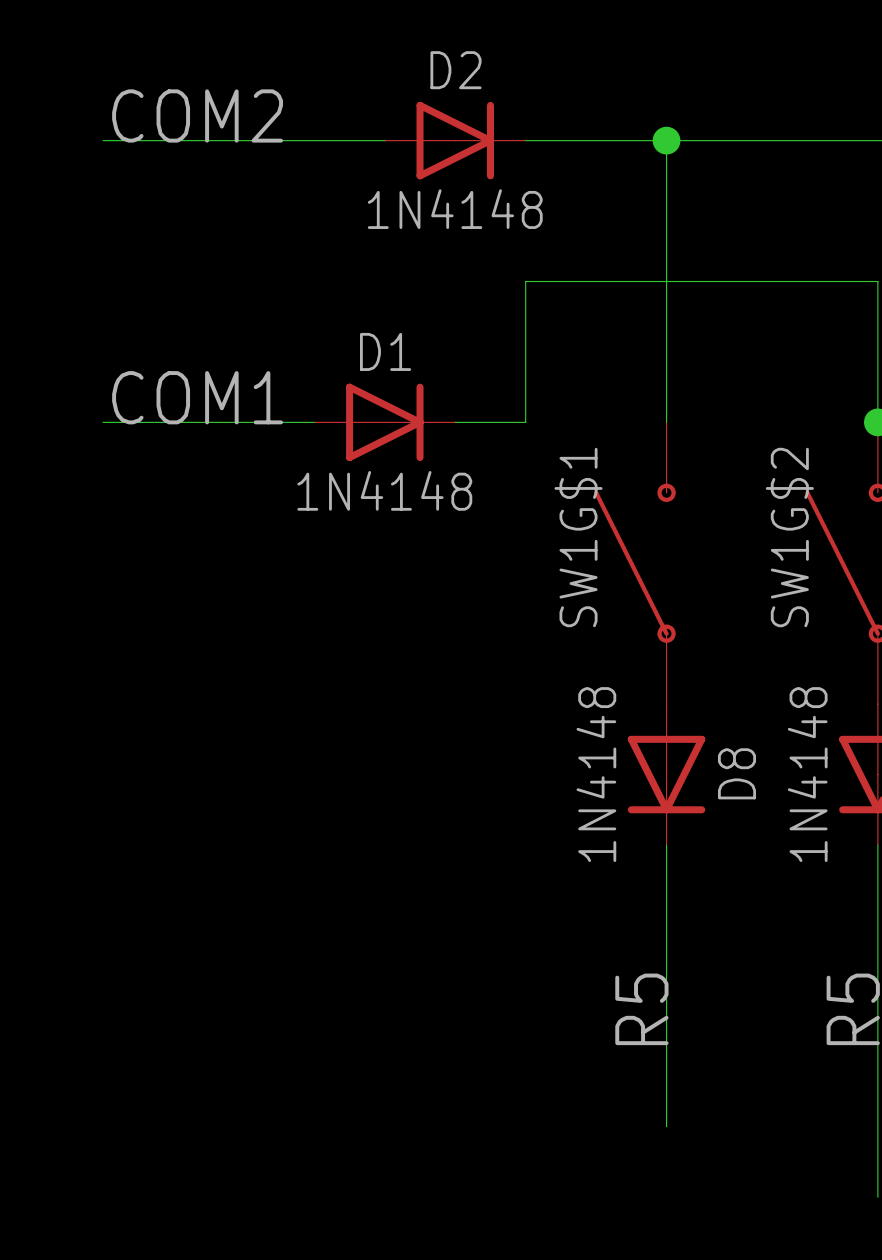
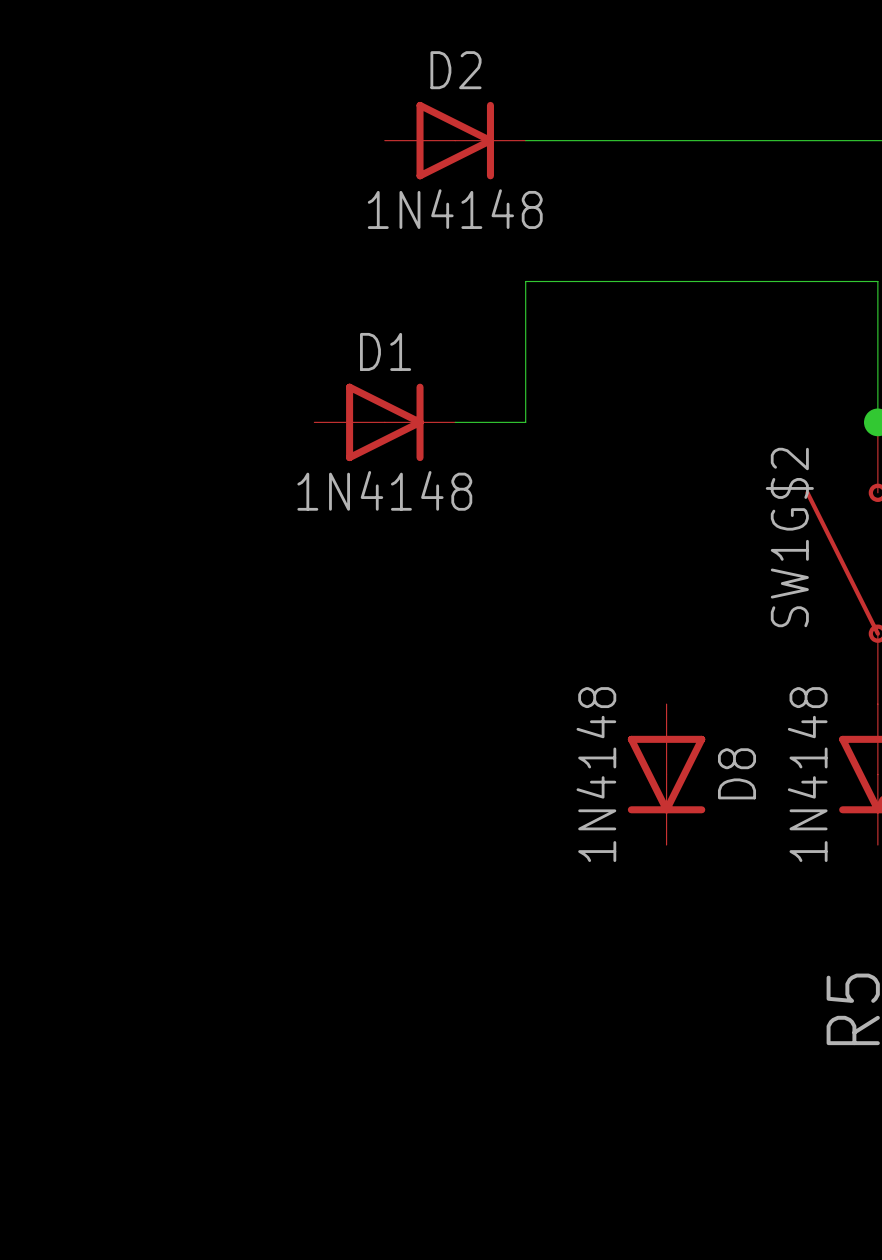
label: COM2 (197, 115) -> none
wire: (103, 140) (384, 140) -> none
wire: (666, 140) (666, 422) -> none
junction: (666, 140) -> none
label: COM1 (197, 397) -> none
wire: (103, 422) (314, 422) -> none
SW1G$1: (634, 563) -> none
wire: (666, 845) (666, 1126) -> none
wire: (877, 845) (877, 1197) -> none
label: R5 (641, 1009) -> none

